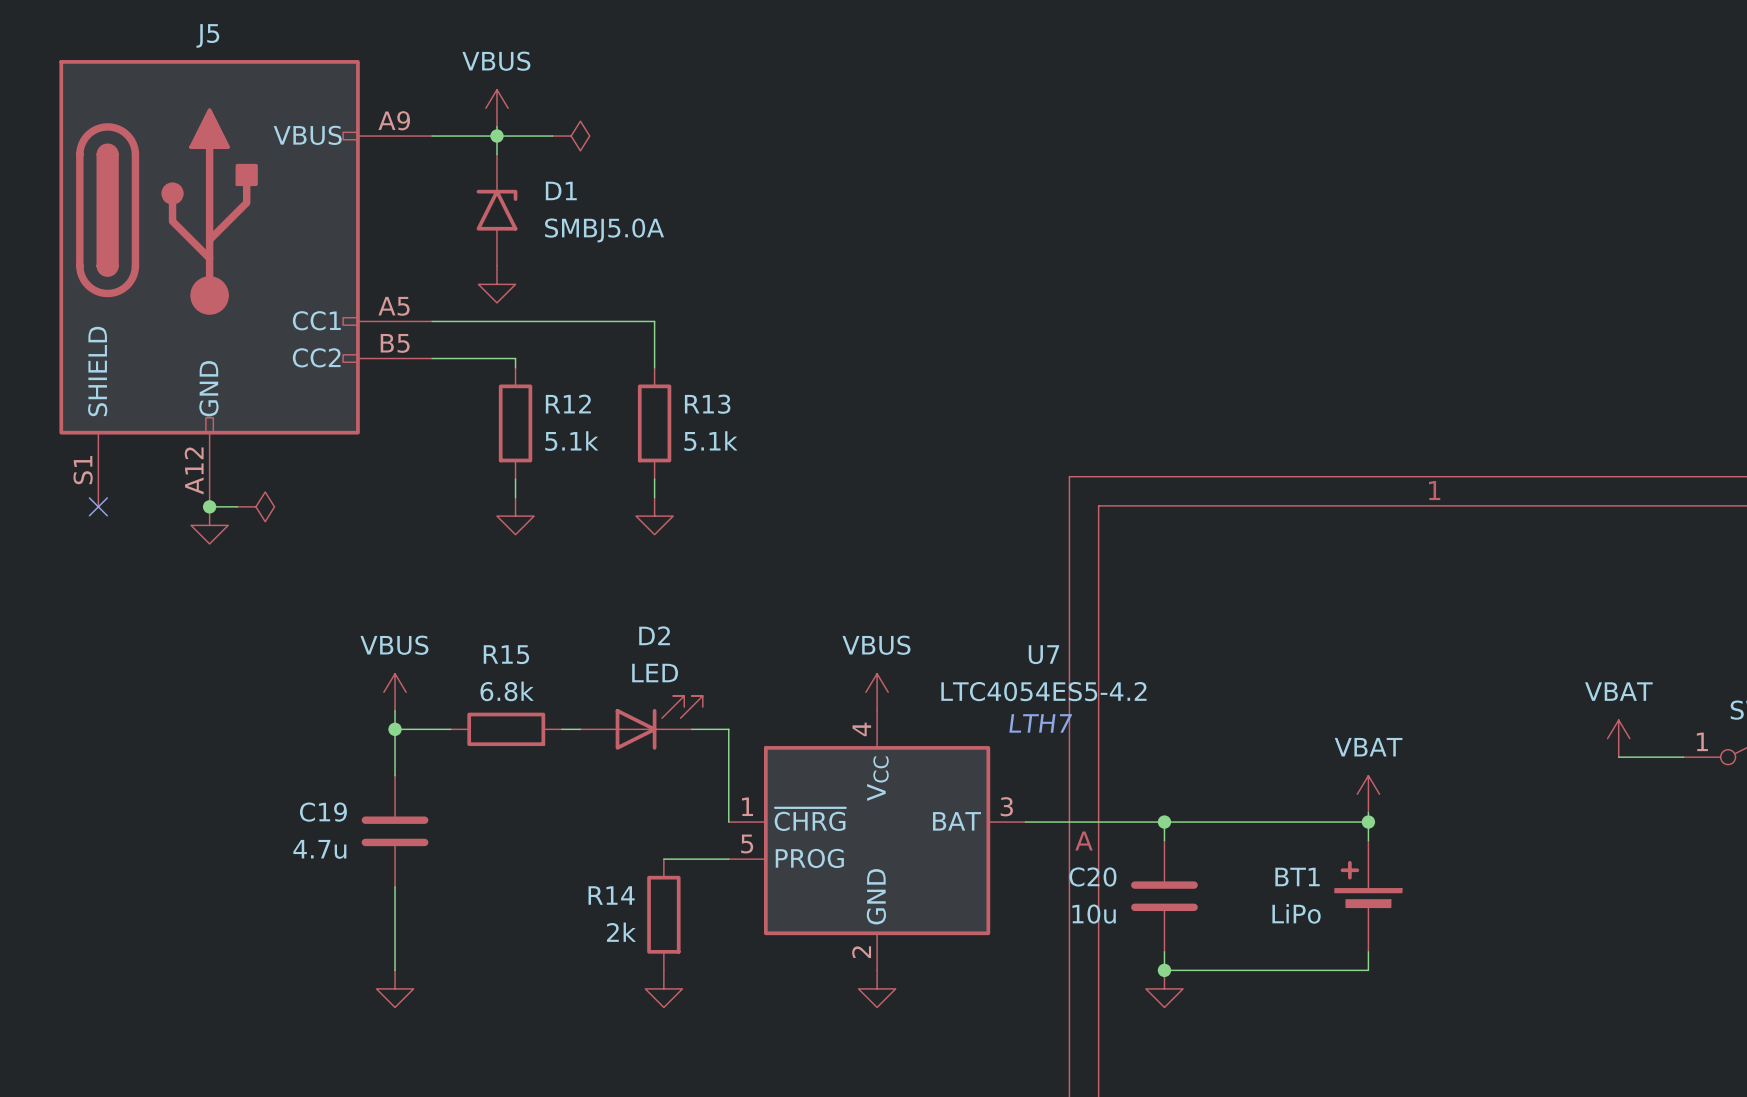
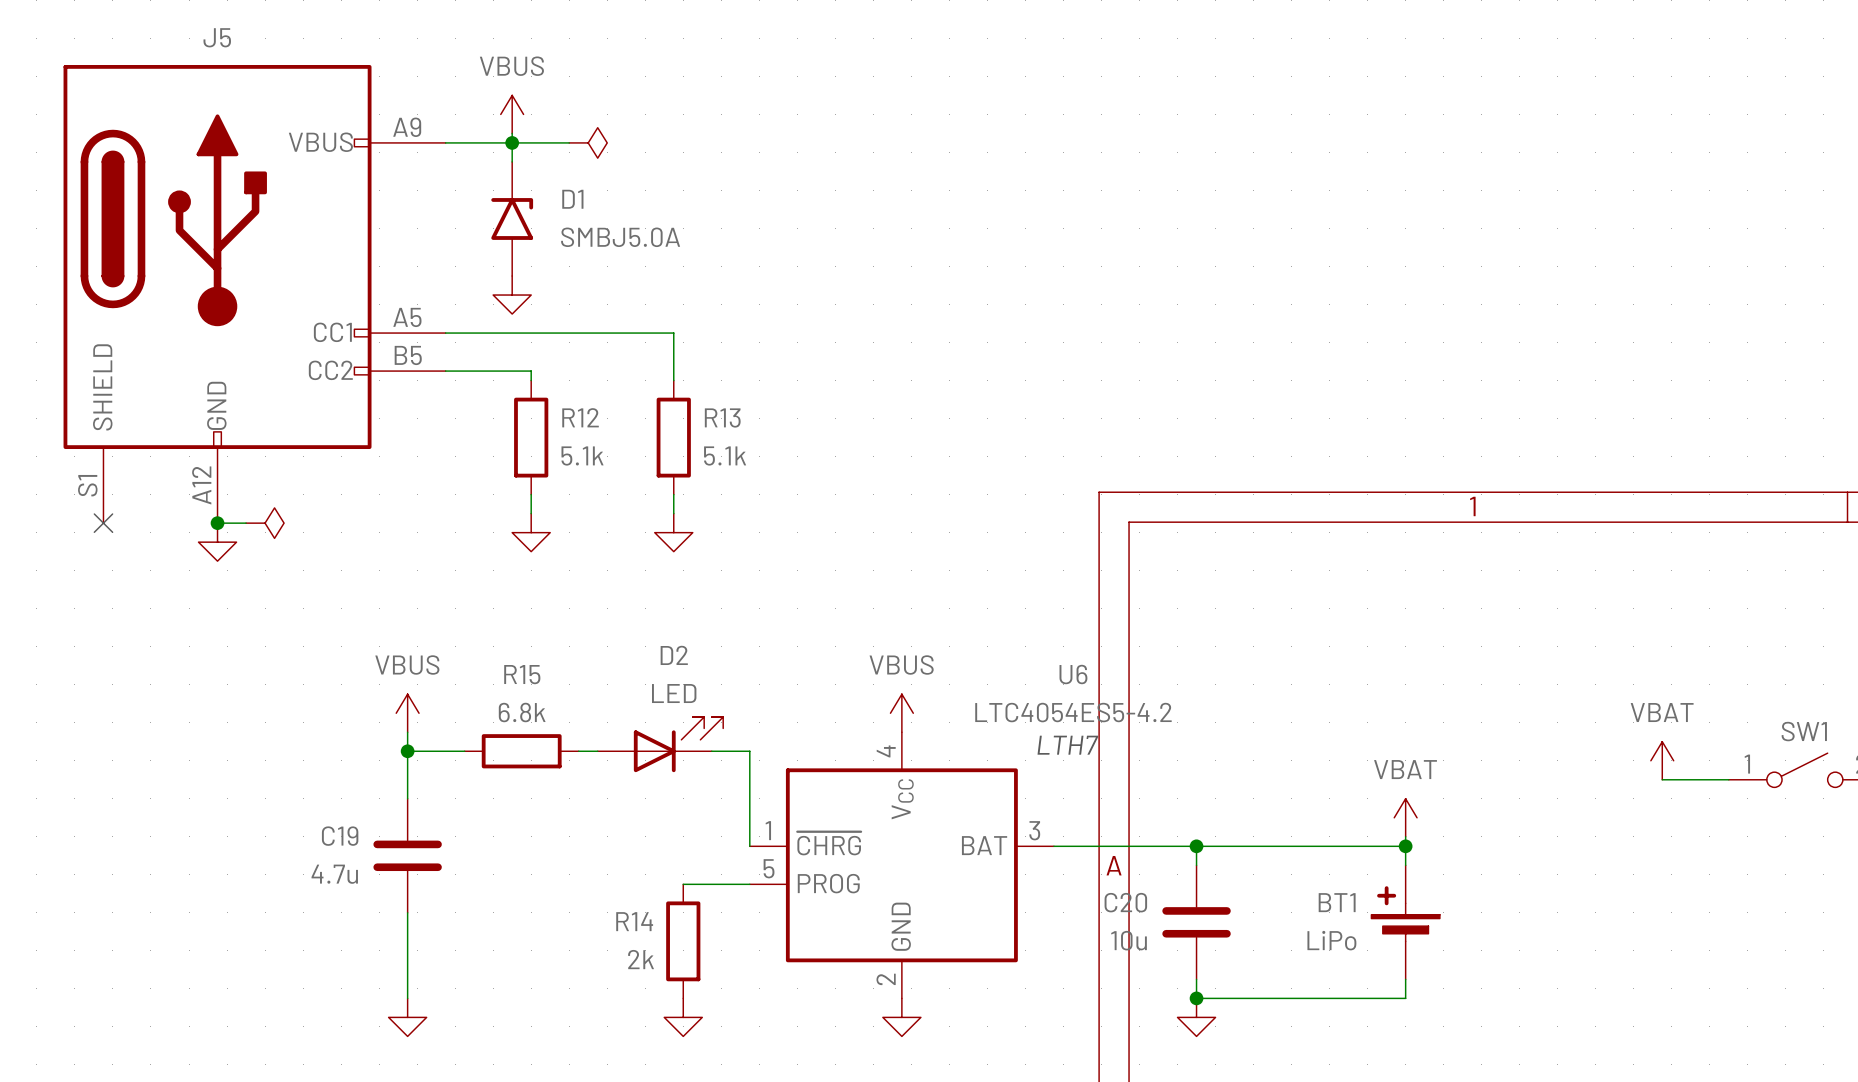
U7 name: U7 (1043, 654) -> U6 (1073, 674)

